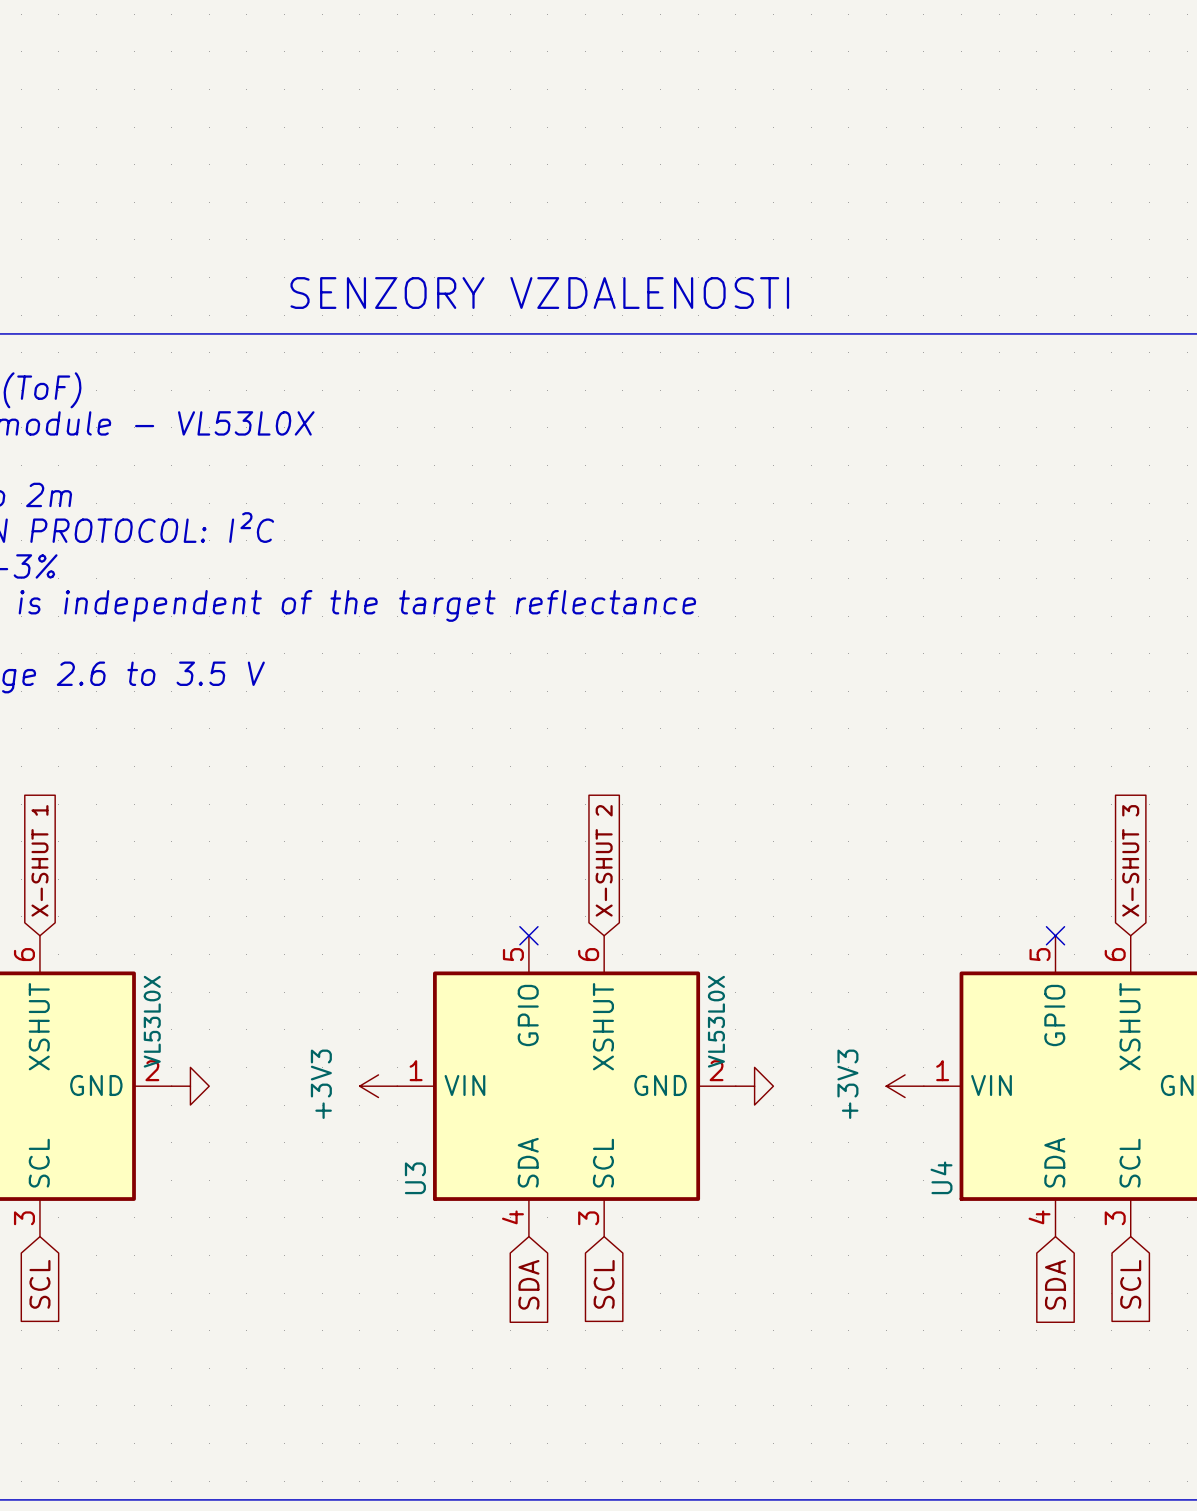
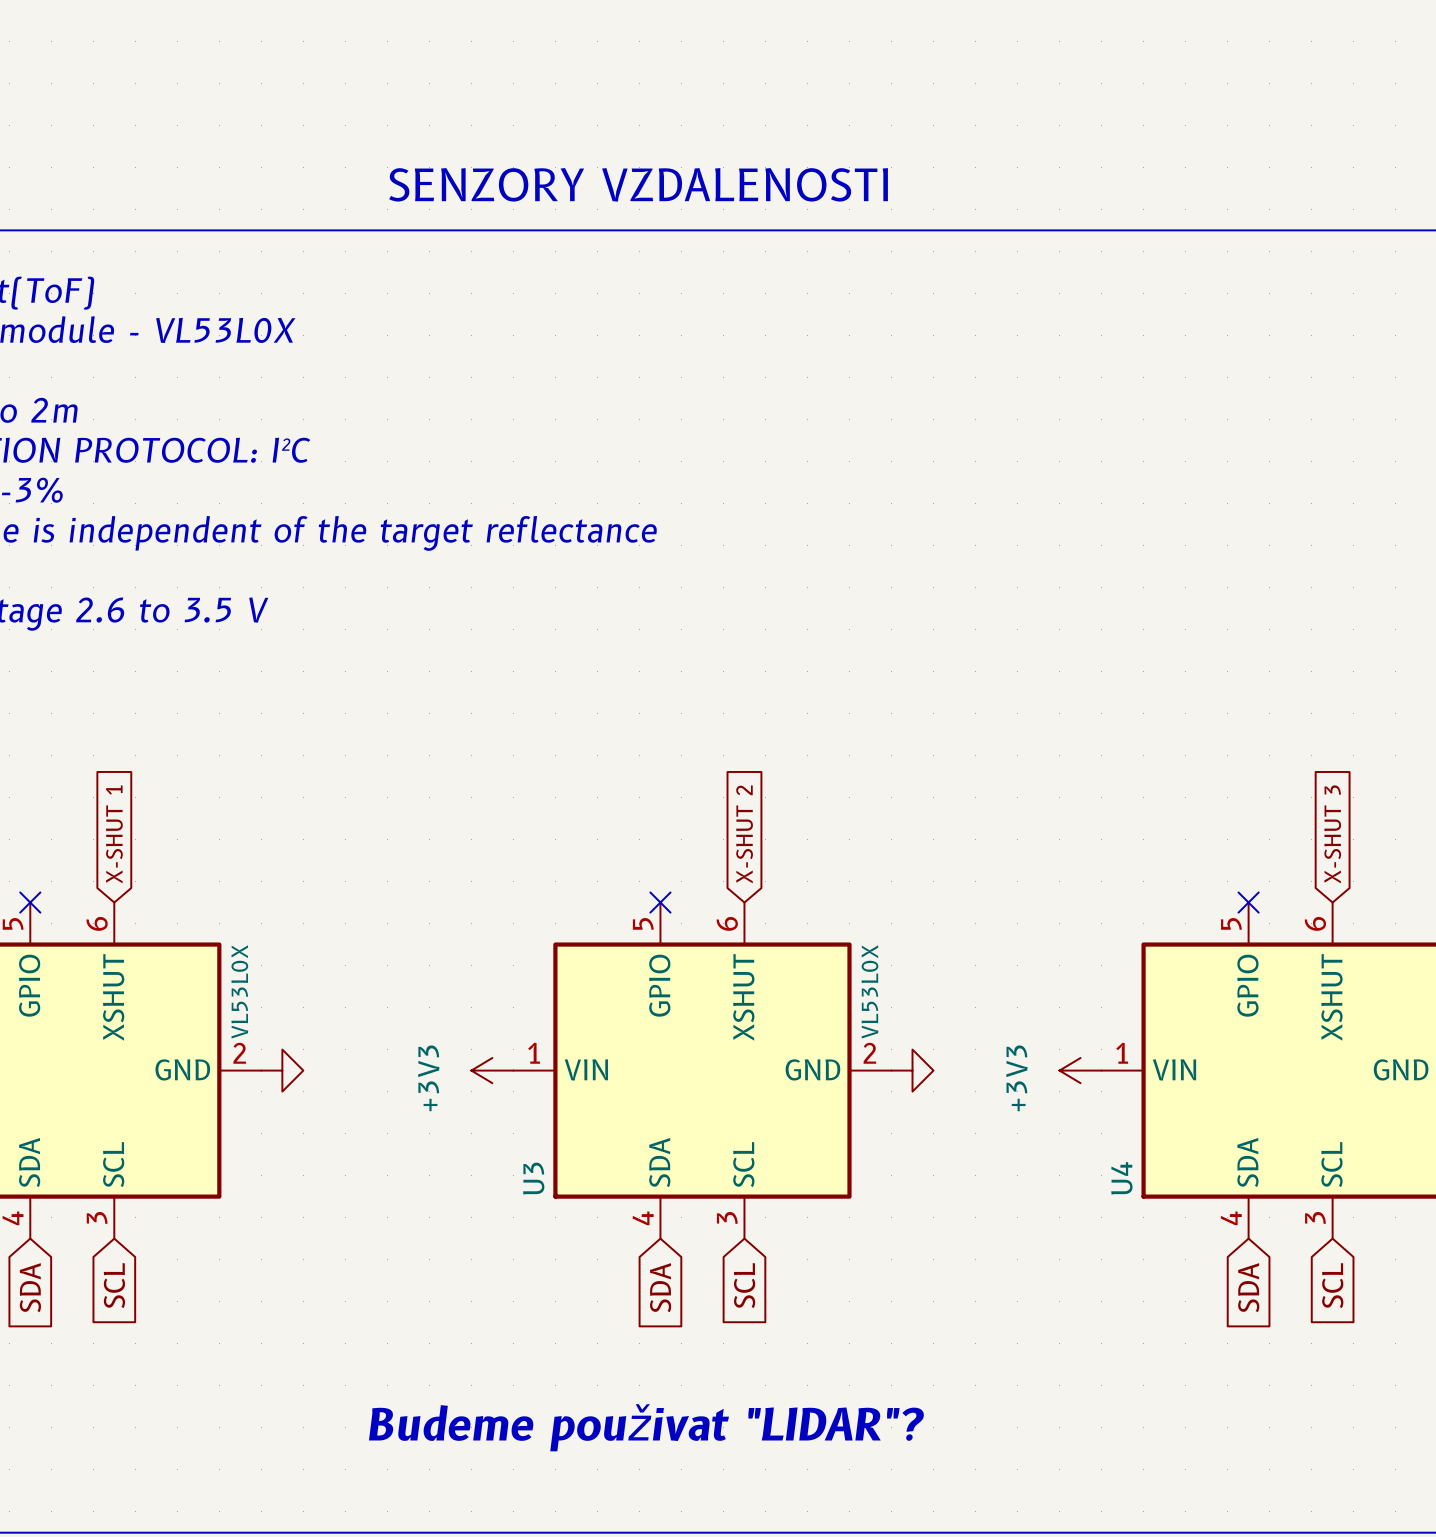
text: none -> Budeme použivat "LIDAR"? (646, 1427)

